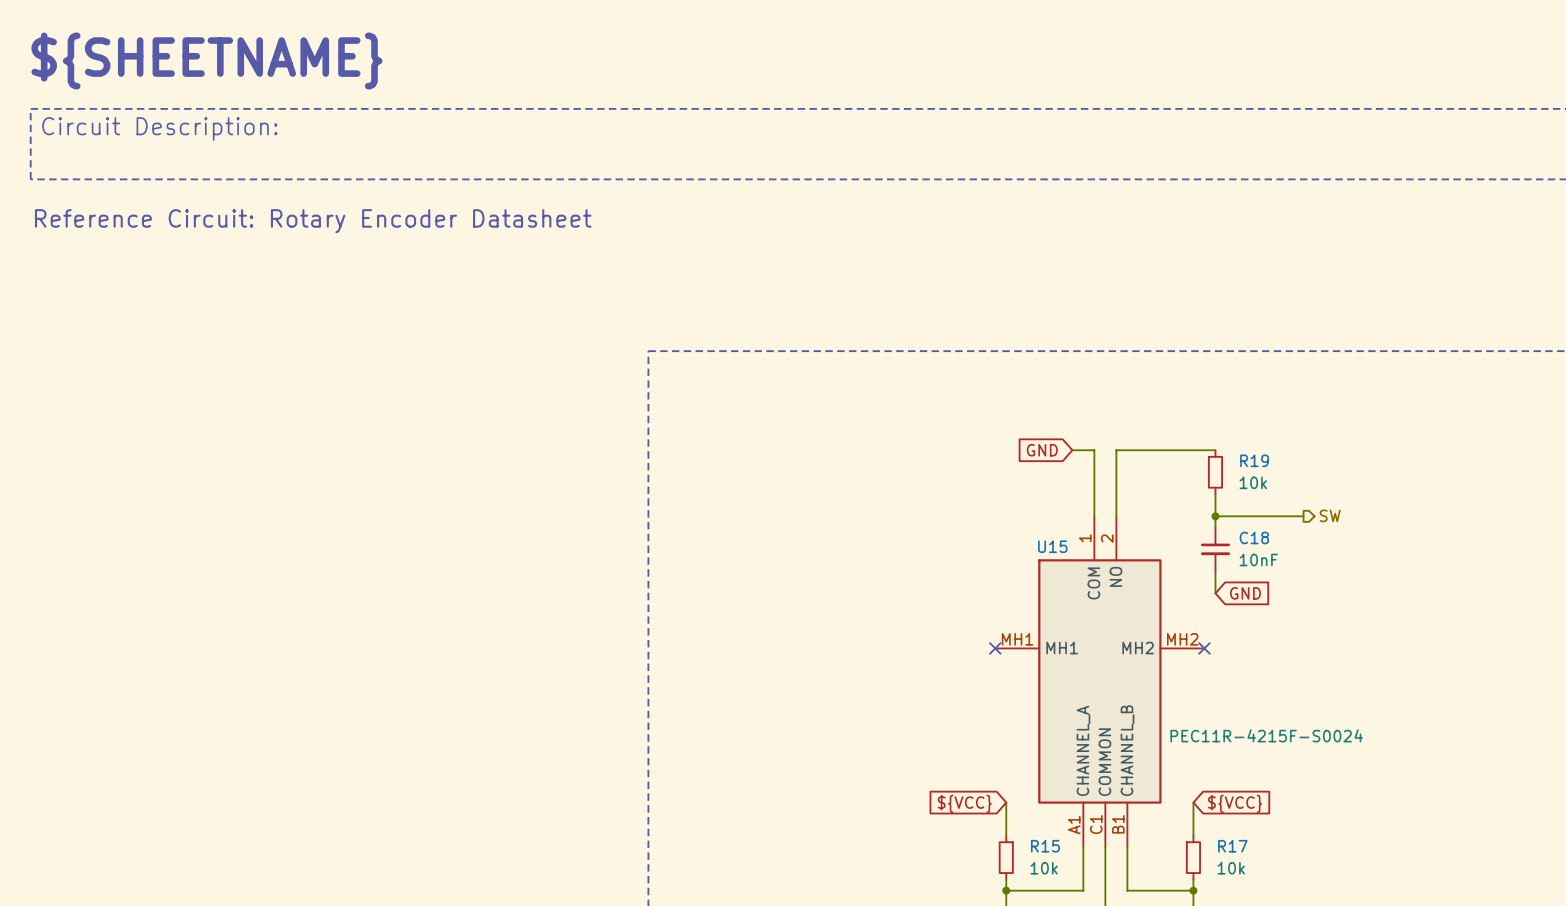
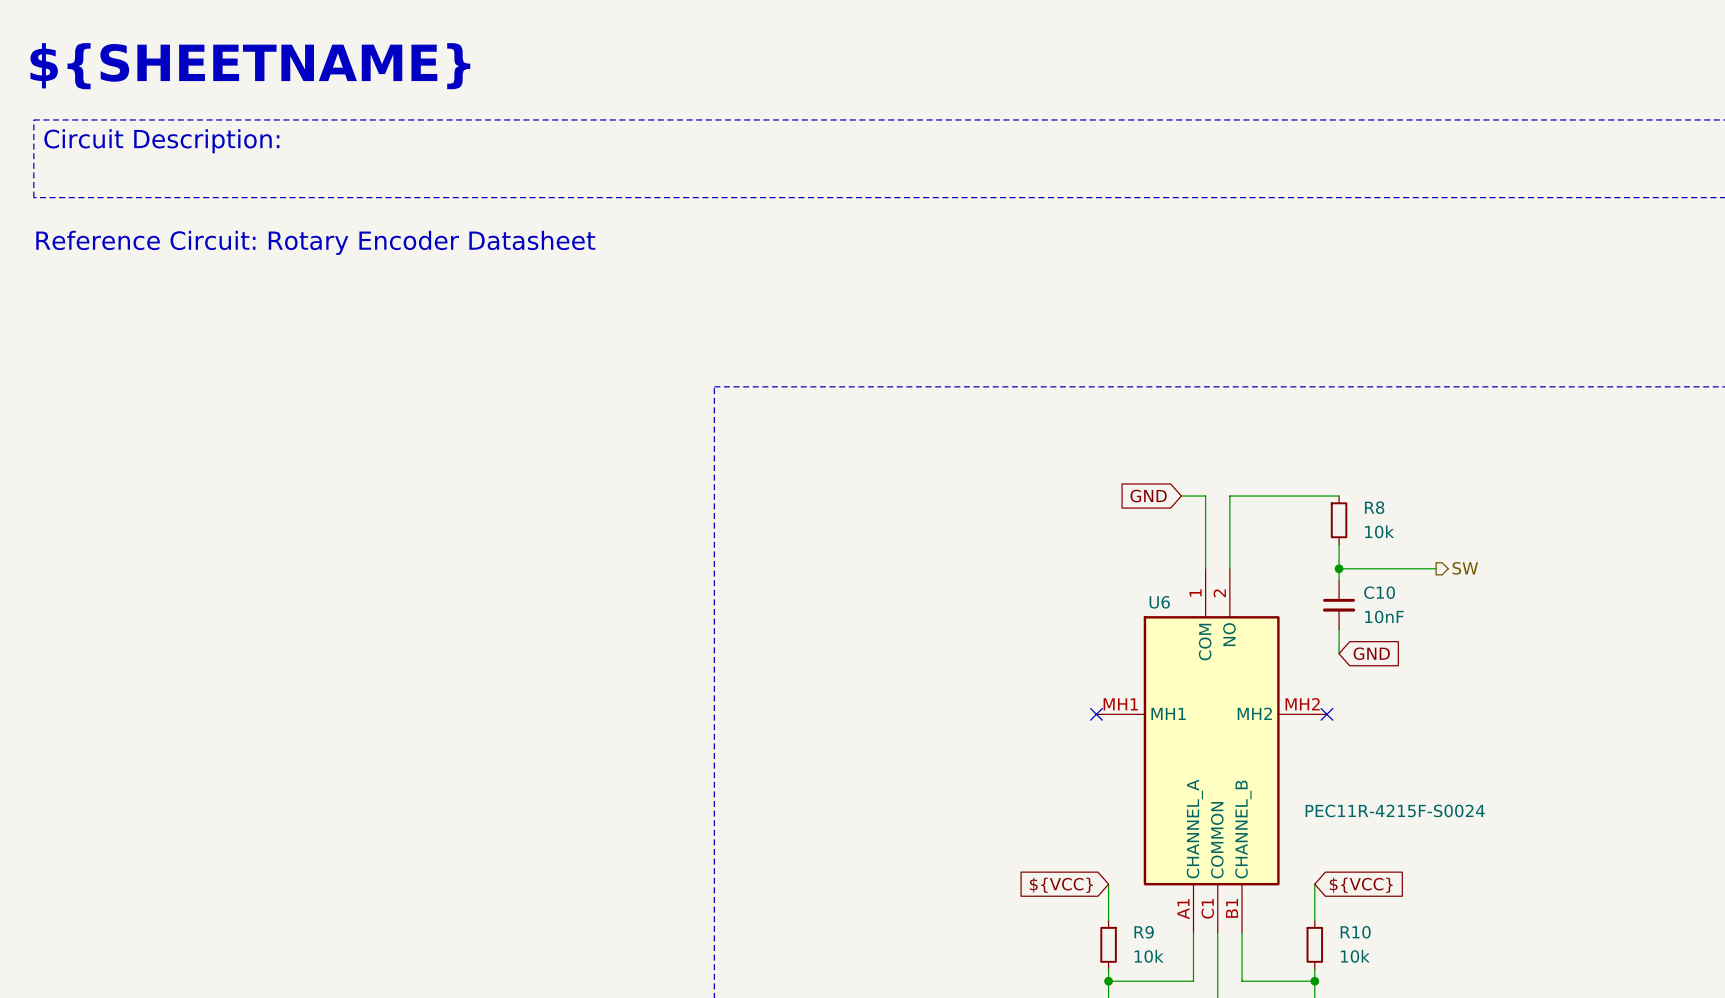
R19 name: R19 (1254, 460) -> R8 (1374, 507)
C18 name: C18 (1254, 537) -> C10 (1379, 592)
U15 name: U15 (1052, 546) -> U6 (1159, 602)
R15 name: R15 (1045, 846) -> R9 (1144, 932)
R17 name: R17 (1232, 846) -> R10 (1355, 932)

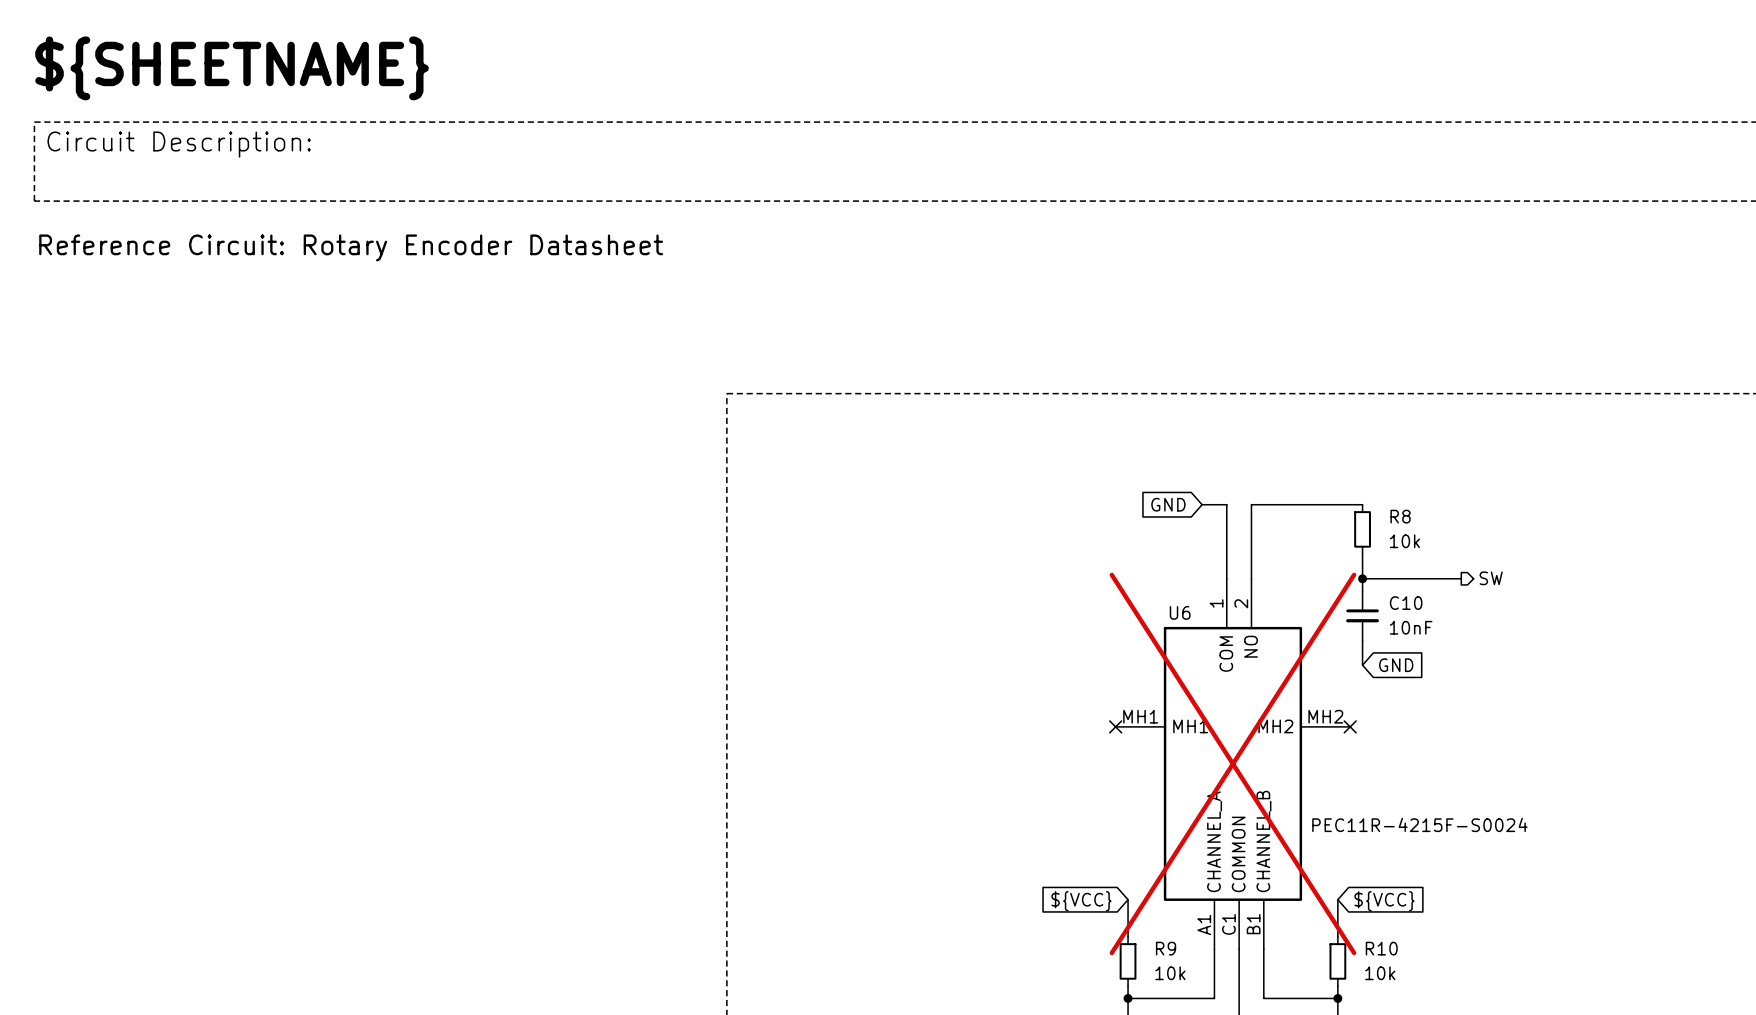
U6 do-not-place cross: none -> (1232, 763)

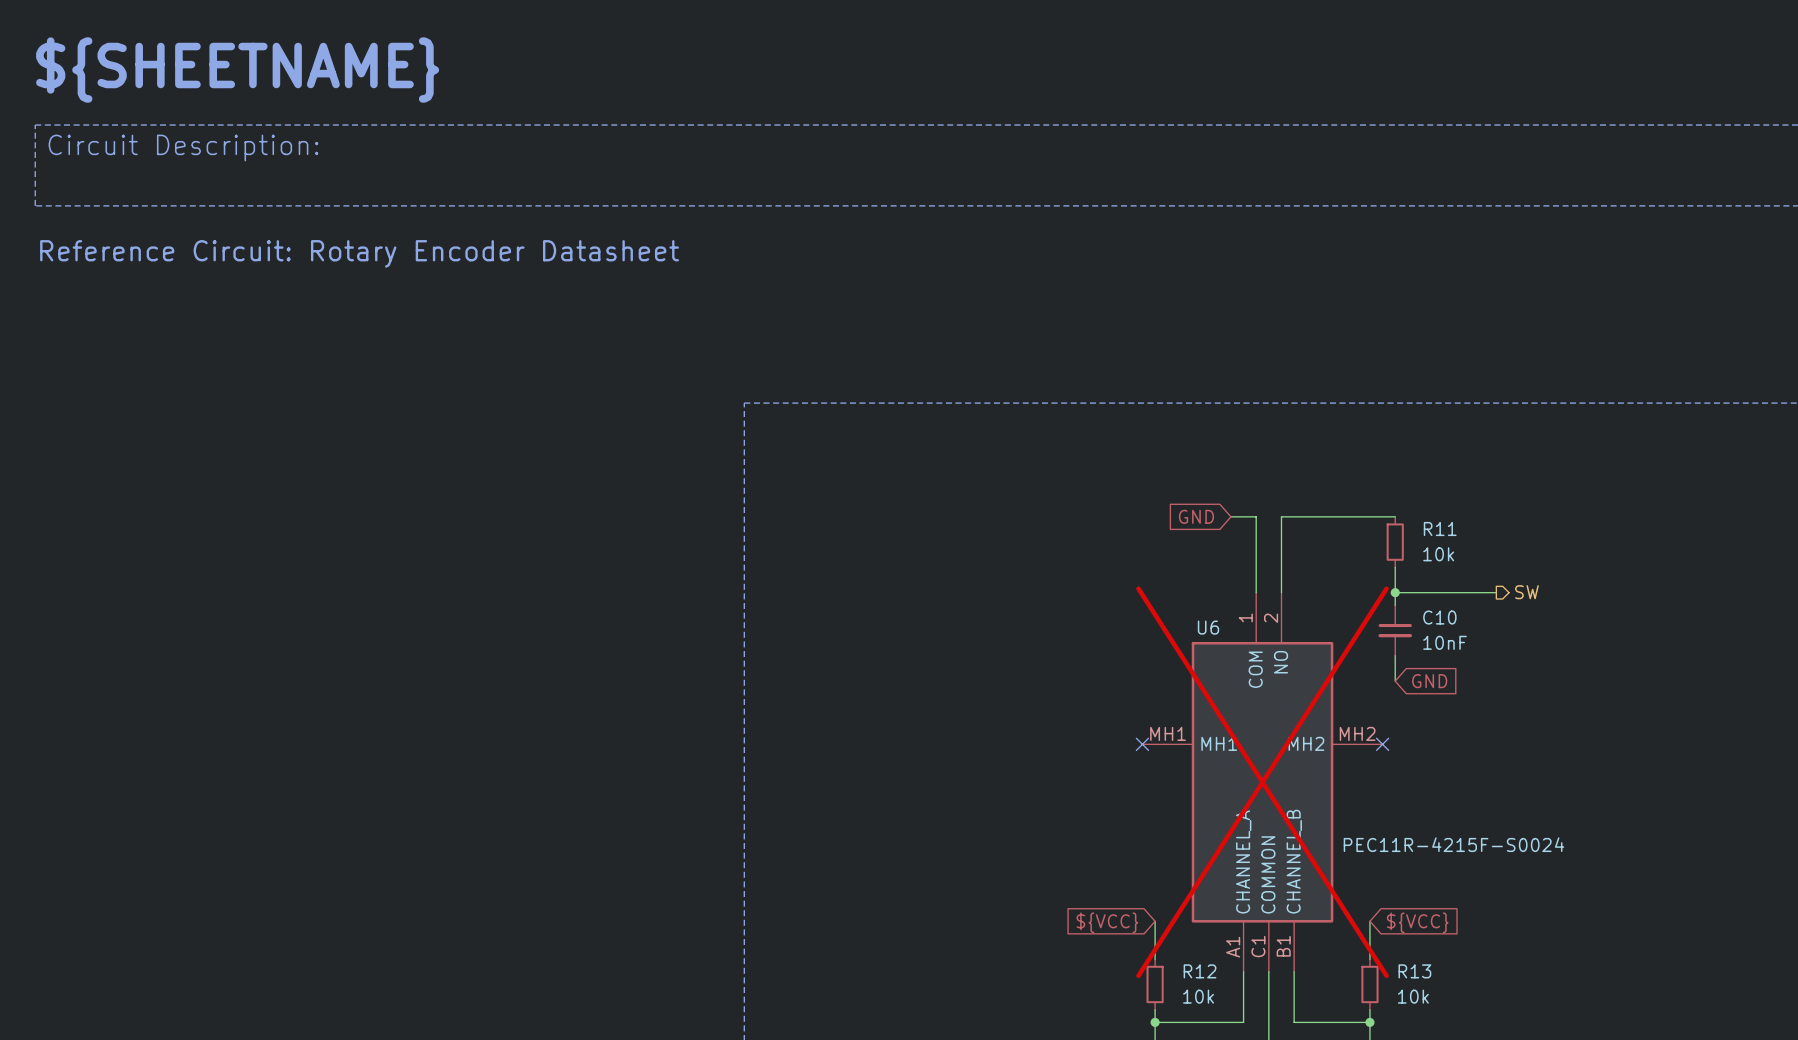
R8 name: R8 (1400, 516) -> R11 (1440, 529)
R9 name: R9 (1166, 948) -> R12 (1200, 971)
R10 name: R10 (1381, 948) -> R13 (1414, 971)

